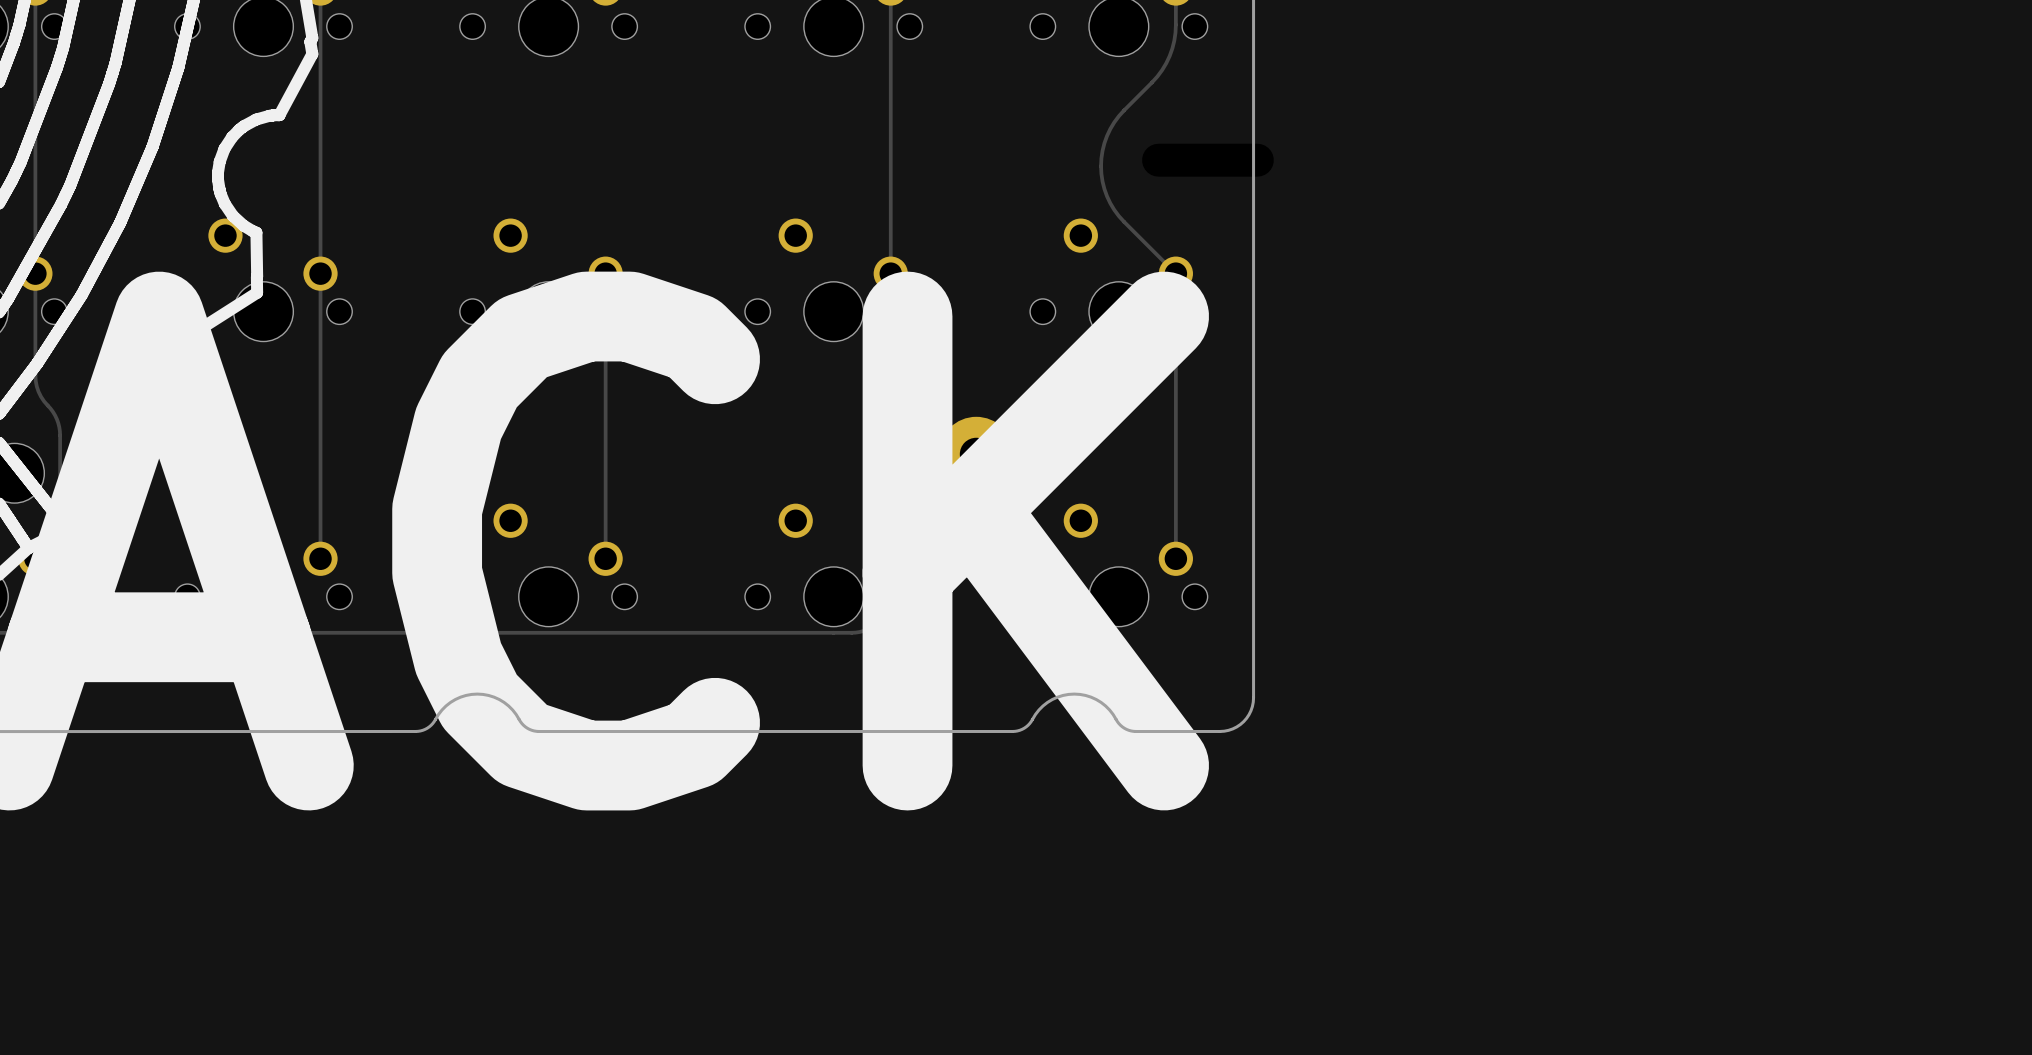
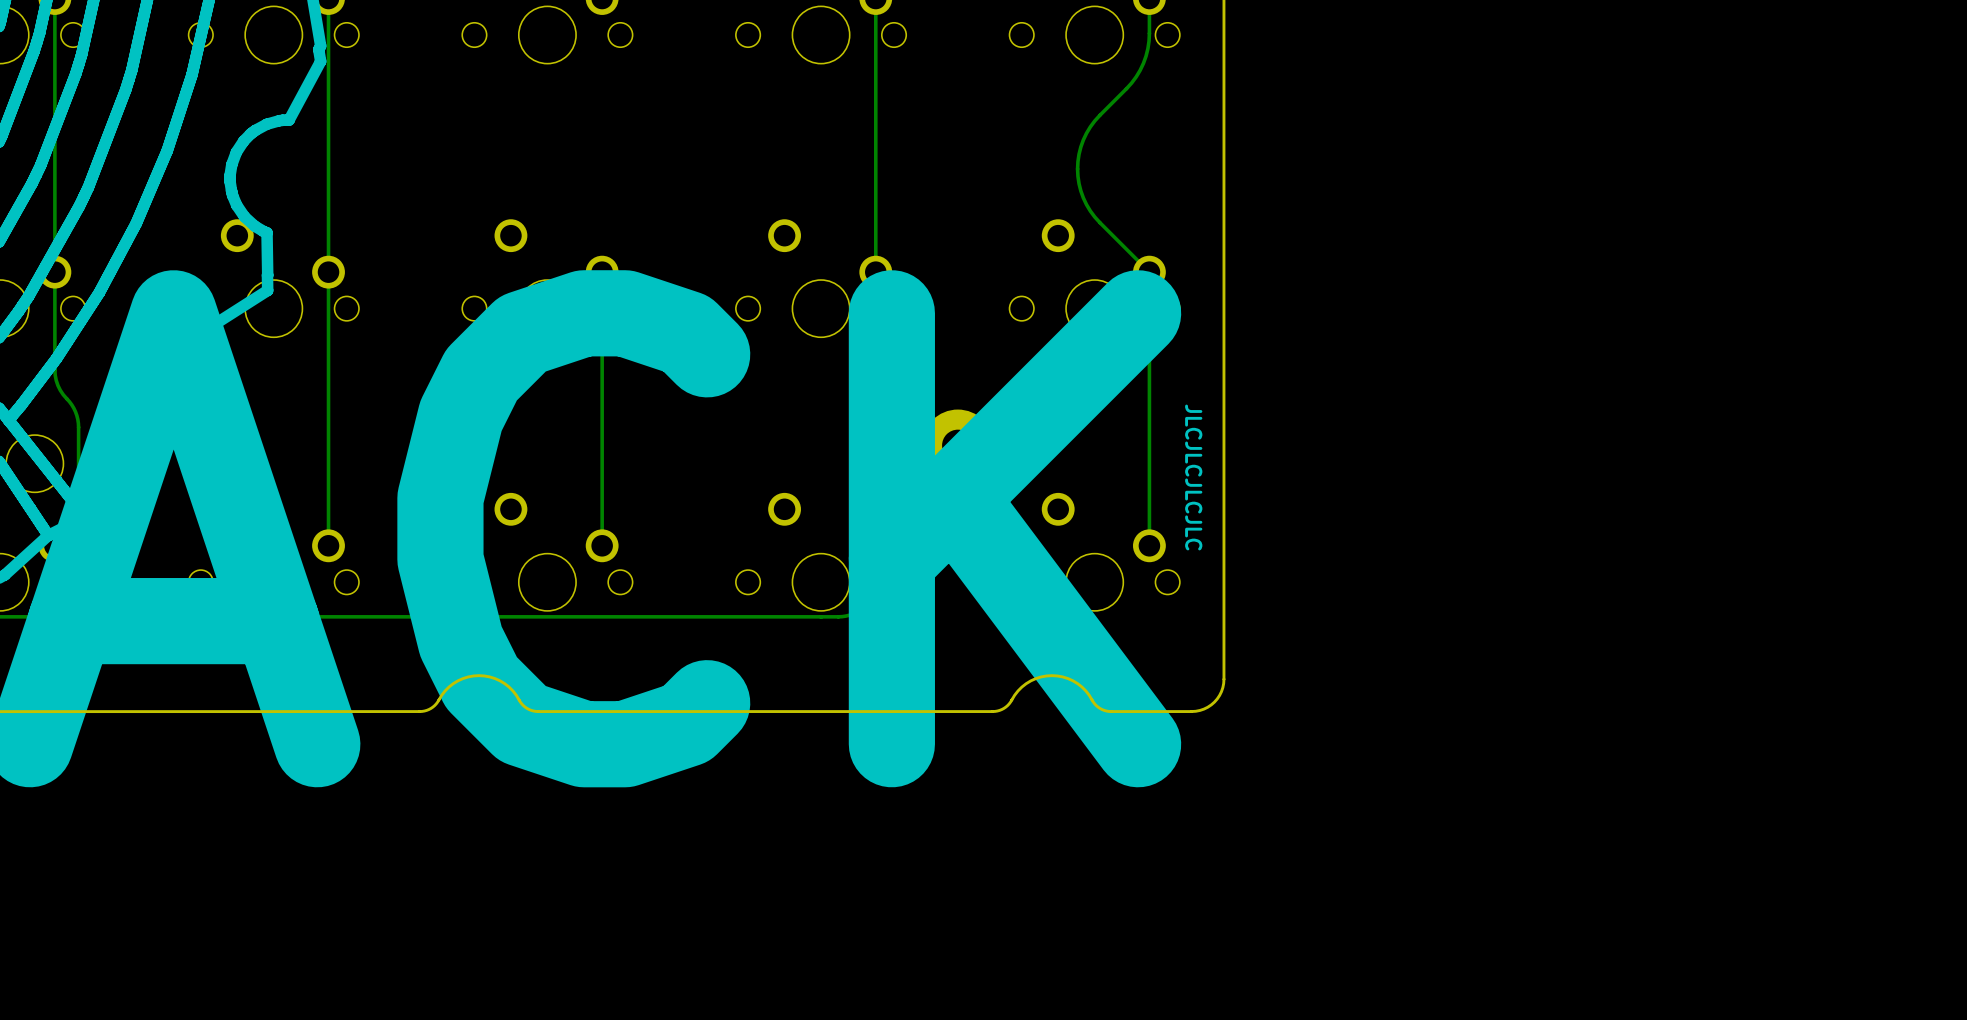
text: none -> JLCJLCJLCJLC (1193, 477)

